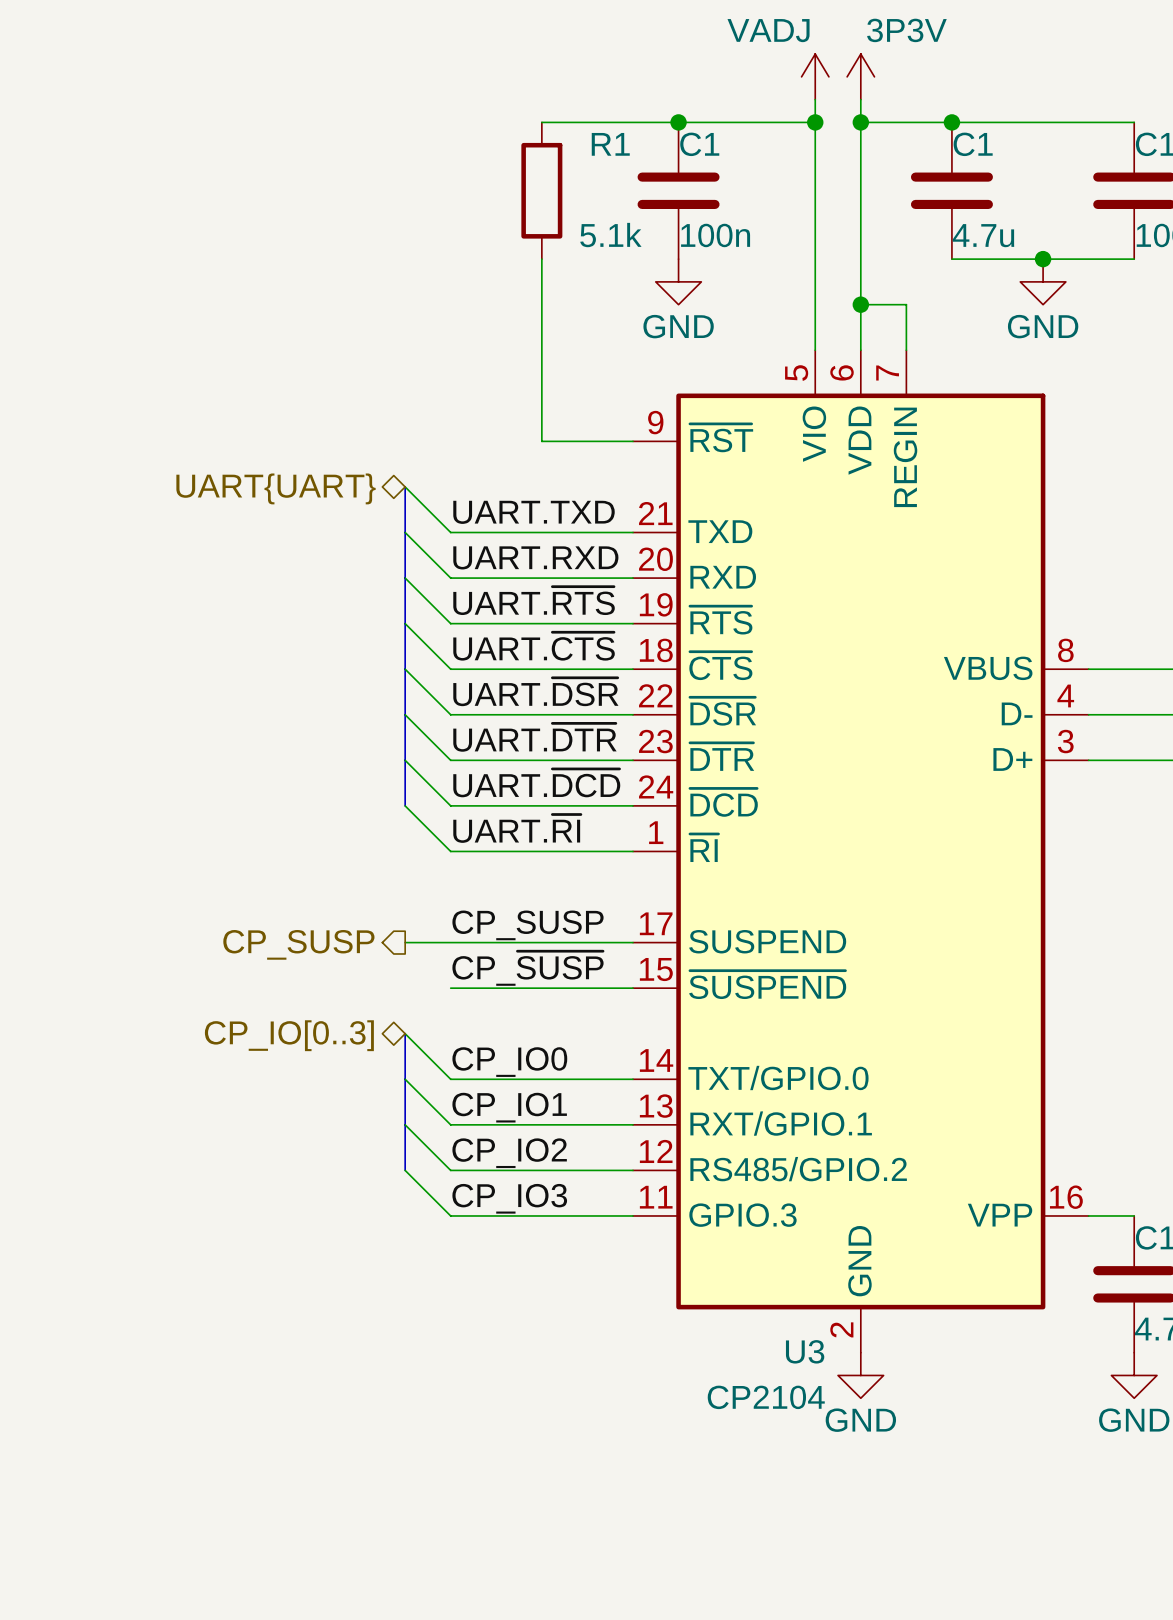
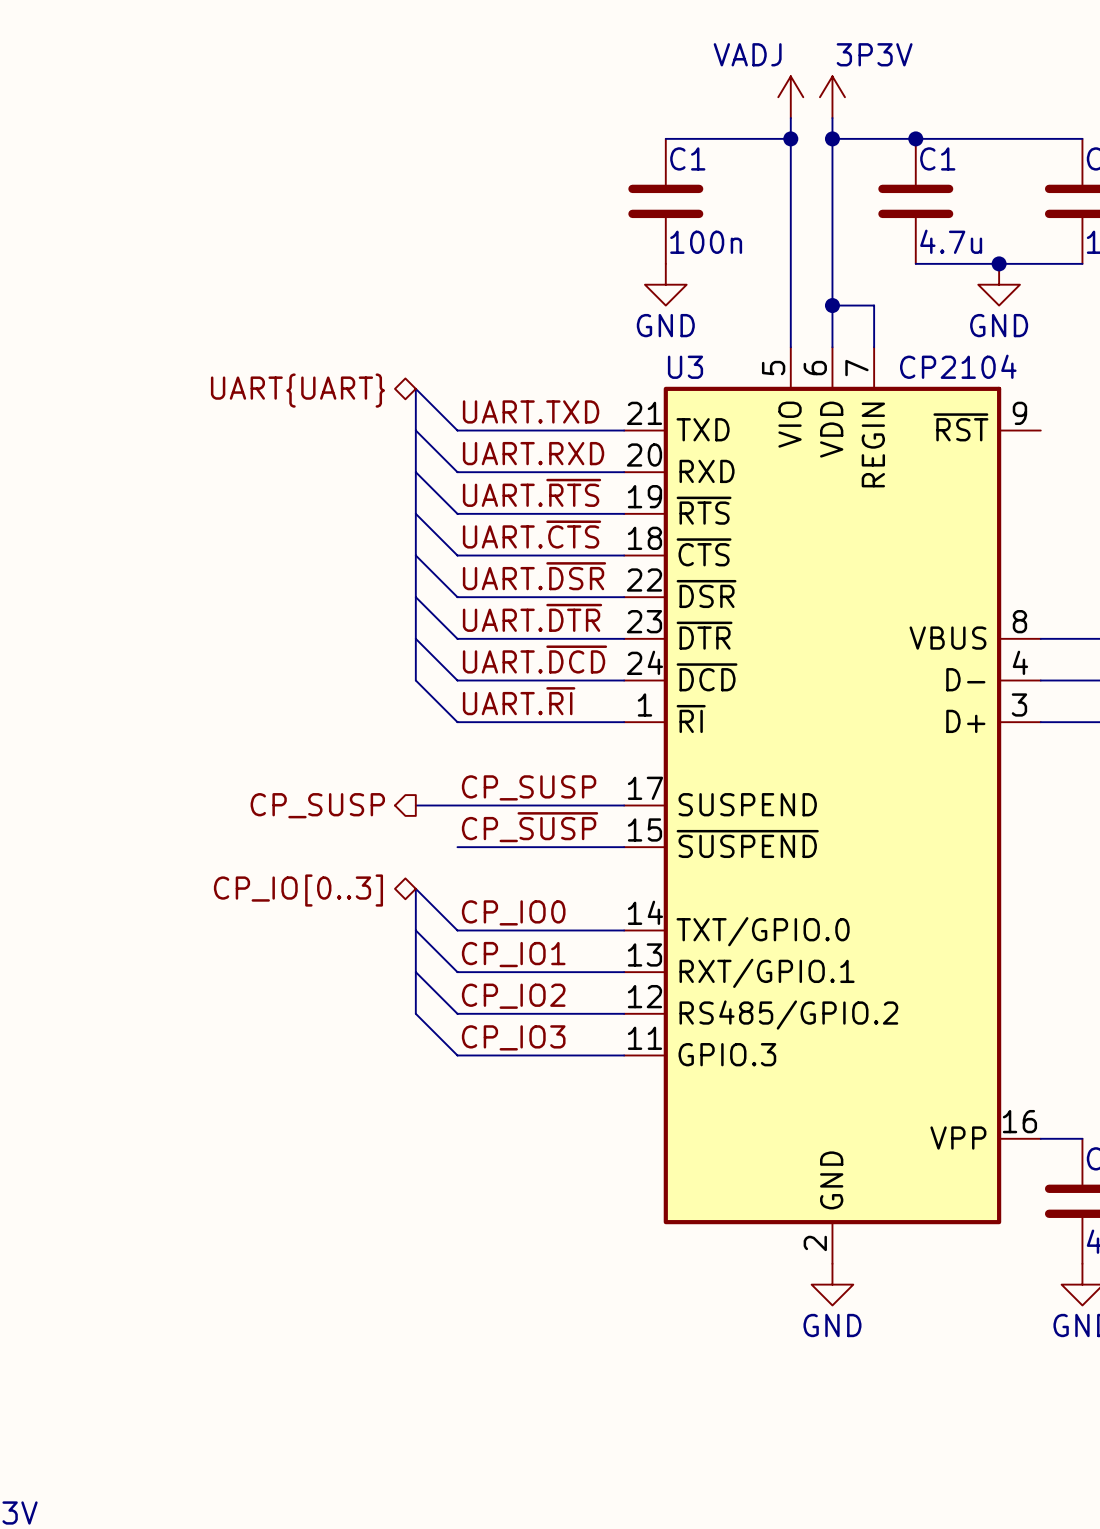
wire: (541, 122) (678, 122) -> none
junction: (678, 122) -> none
R1: 5.1k (541, 190) -> none
wire: (541, 259) (541, 441) -> (415, 388) (457, 430) (540, 430)
U3 symbol: [632, 350, 1089, 1353] -> [624, 347, 1041, 1264]
label: none -> UART.TXD (531, 411)
label: none -> UART.RXD (533, 453)
hierarchical label position: UART{UART} (276, 488) -> UART{UART} (297, 390)
label: UART.TXD (534, 512) -> UART.~{RTS} (532, 492)
label: UART.RXD (535, 557) -> UART.~{CTS} (532, 534)
label: UART.~{RTS} (534, 600) -> UART.~{DSR} (534, 576)
label: UART.~{CTS} (534, 646) -> UART.~{DTR} (532, 617)
label: UART.~{DSR} (535, 691) -> UART.~{DCD} (534, 659)
bus: (405, 714) (405, 805) -> (415, 388) (415, 472)
label: UART.~{DTR} (534, 737) -> UART.~{RI} (519, 701)
wire: (405, 760) (450, 805) (632, 805) -> (415, 430) (457, 472) (624, 472)
label: UART.~{DCD} (536, 783) -> none
wire: (405, 805) (450, 851) -> (415, 805) (457, 805)
label: UART.~{RI} (517, 828) -> CP_SUSP (529, 787)
hierarchical label: none -> CP_SUSP (317, 805)
wire: none -> (457, 847) (624, 847)
label: CP_SUSP (527, 925) -> CP_~{SUSP} (530, 827)
wire: (405, 942) (632, 942) -> (415, 888) (457, 930)
hierarchical label shape: output (298, 944) -> bidirectional (298, 890)
hierarchical label: CP_SUSP (298, 944) -> CP_IO[0..3] (298, 890)
label: CP_~{SUSP} (527, 968) -> CP_IO0 (513, 912)
label: none -> CP_IO1 (513, 954)
hierarchical label: CP_IO[0..3] (289, 1035) -> none
label: CP_IO0 (509, 1062) -> CP_IO2 (513, 996)
bus: (405, 1079) (405, 1170) -> (415, 888) (415, 972)
label: CP_IO1 (509, 1107) -> CP_IO3 (513, 1037)
wire: (405, 1124) (450, 1170) (632, 1170) -> (415, 930) (457, 972) (624, 972)
label: CP_IO2 (509, 1153) -> none
wire: (405, 1170) (450, 1215) (632, 1215) -> none
label: CP_IO3 (509, 1198) -> none
U3 name position: U3 (805, 1351) -> U3 (685, 367)
U3 value position: CP2104 (766, 1397) -> CP2104 (958, 366)

